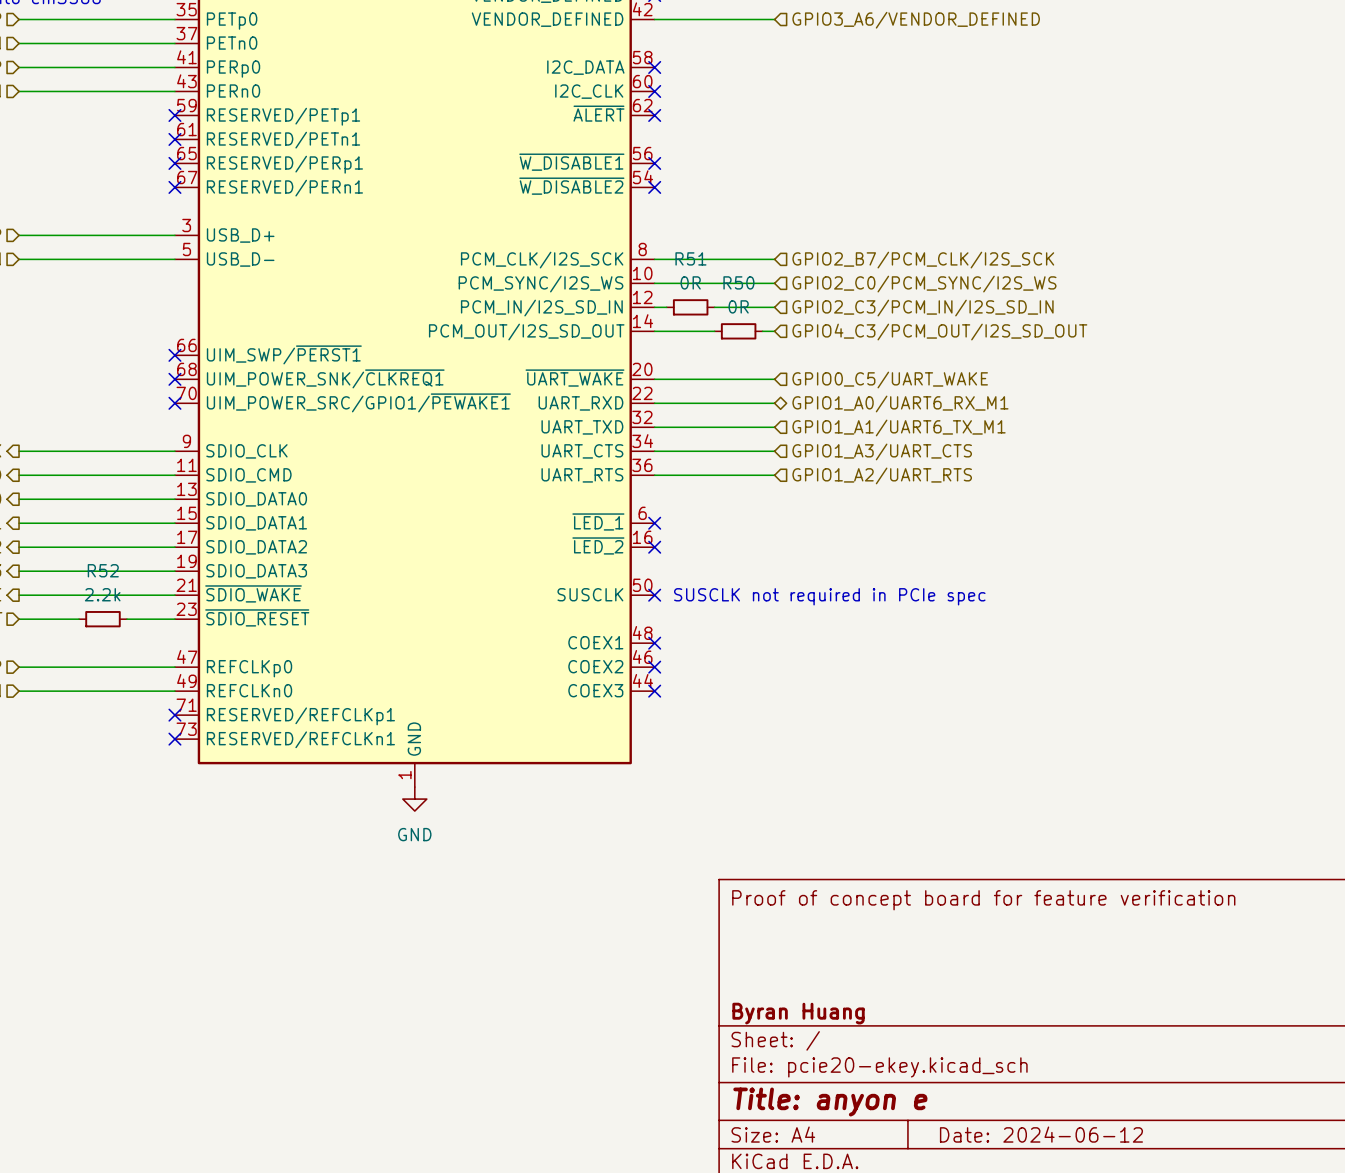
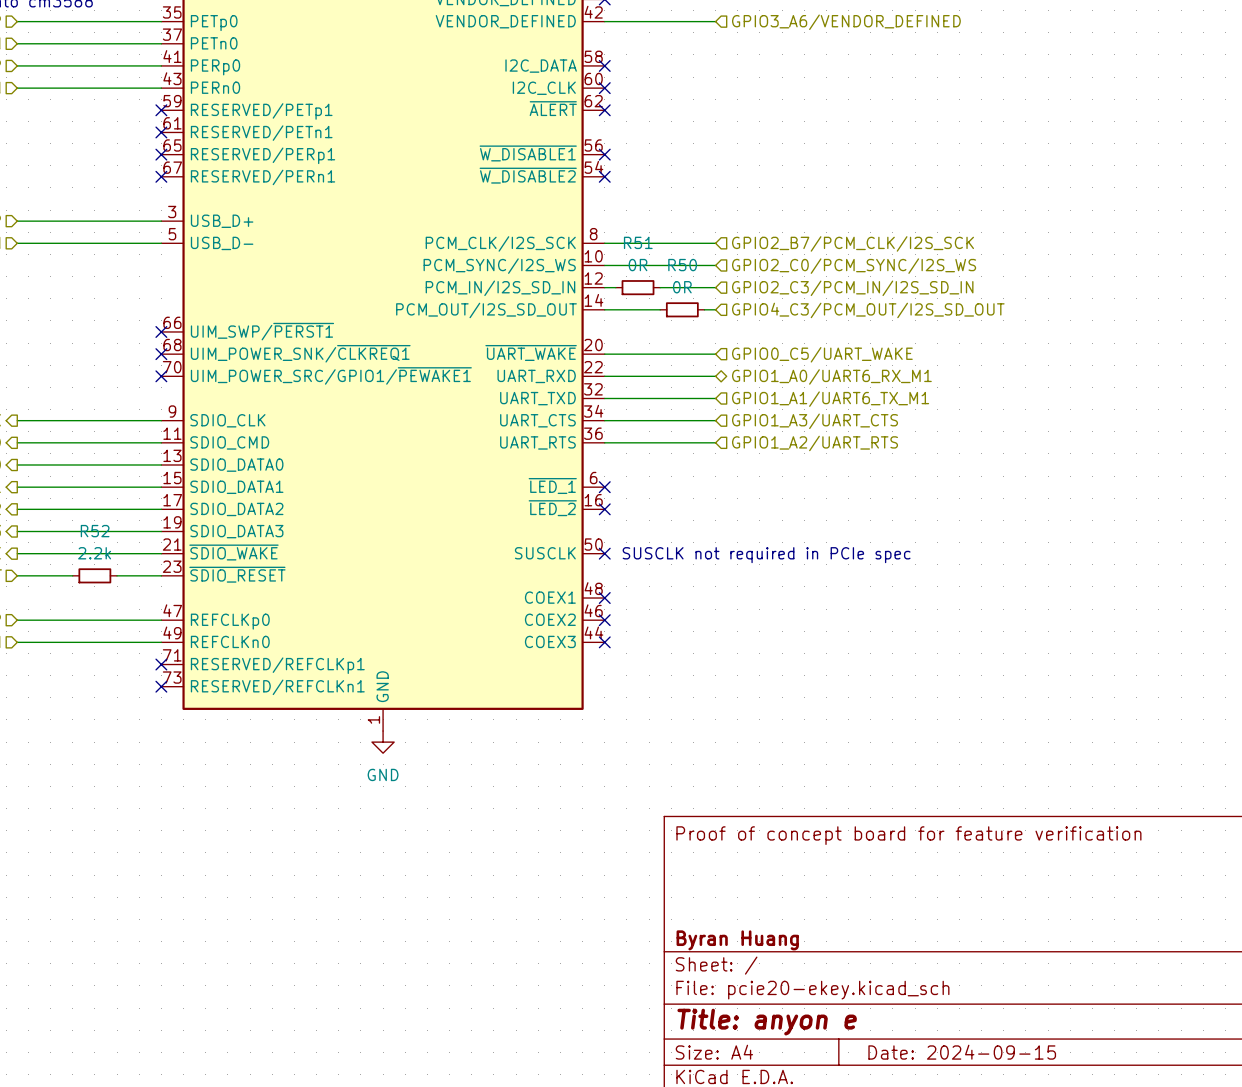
title block: Date: 2024-06-12 (1041, 1134) -> Date: 2024-09-15 (962, 1052)

